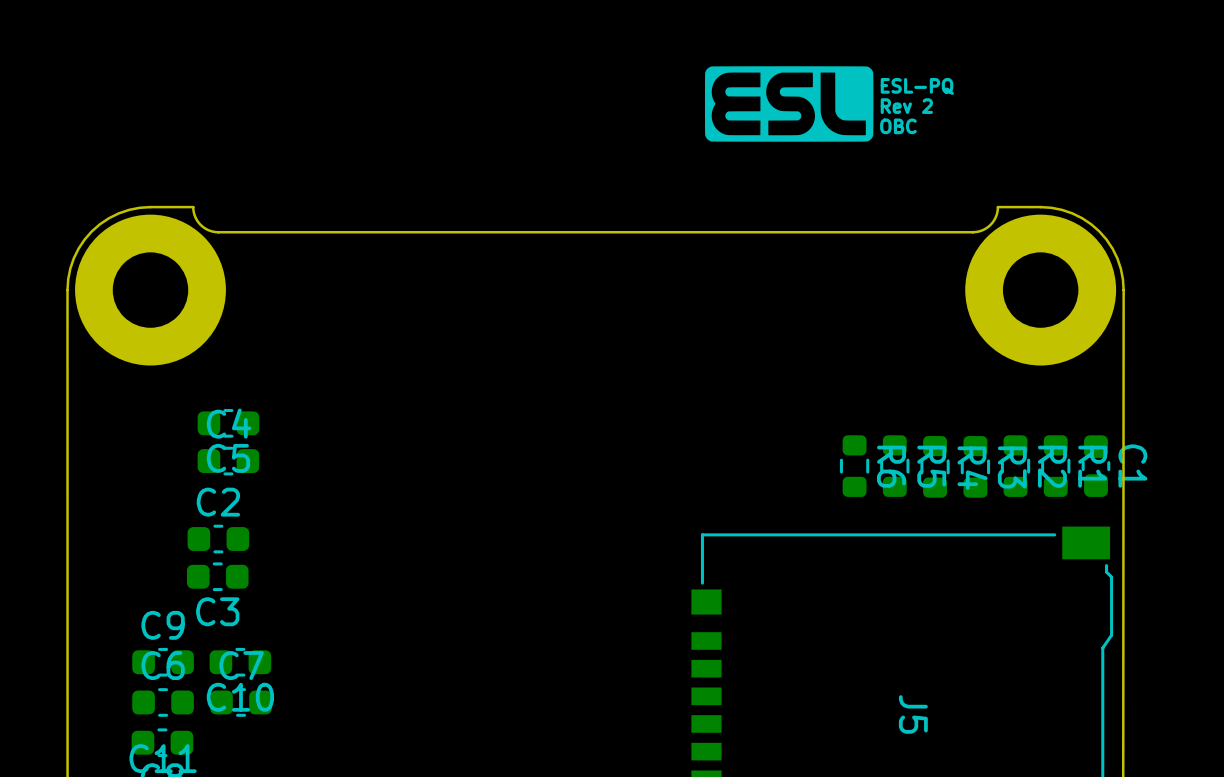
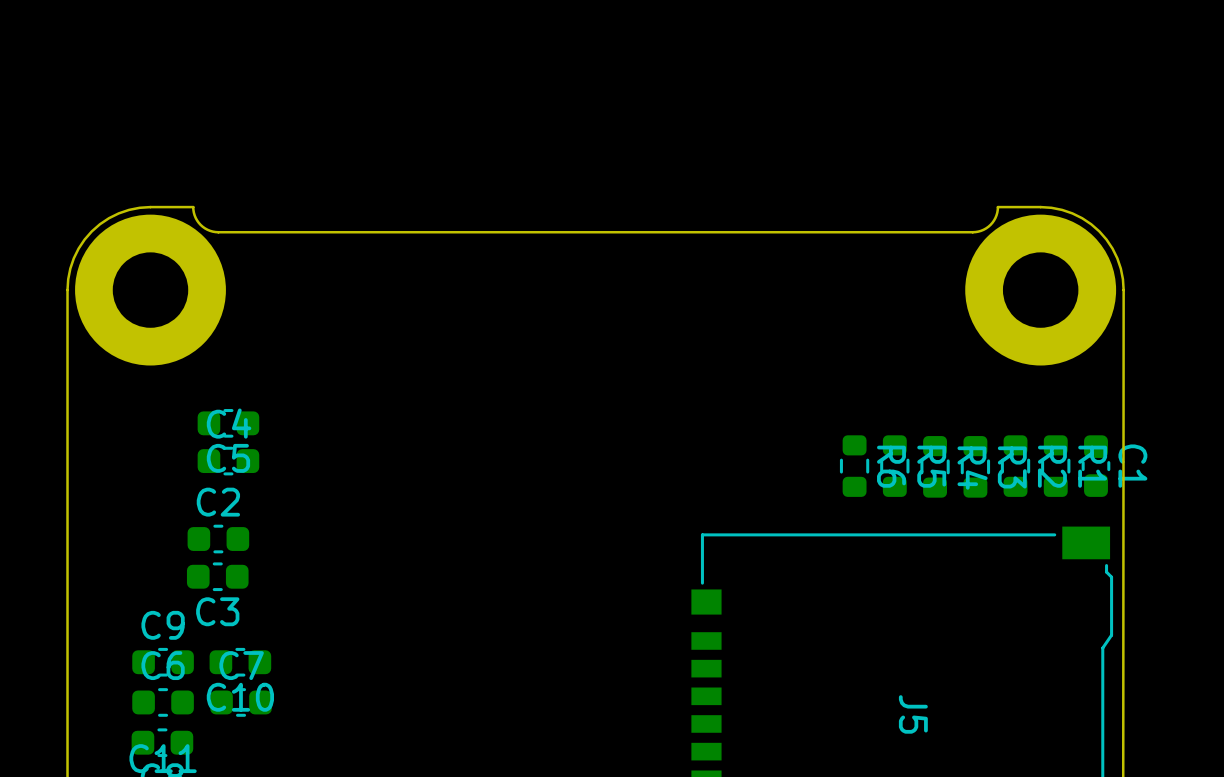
drawing: [704, 66, 874, 142] -> none
text: ESL-PQ (917, 86) -> none
text: Rev 2 (906, 106) -> none
text: OBC (898, 126) -> none

